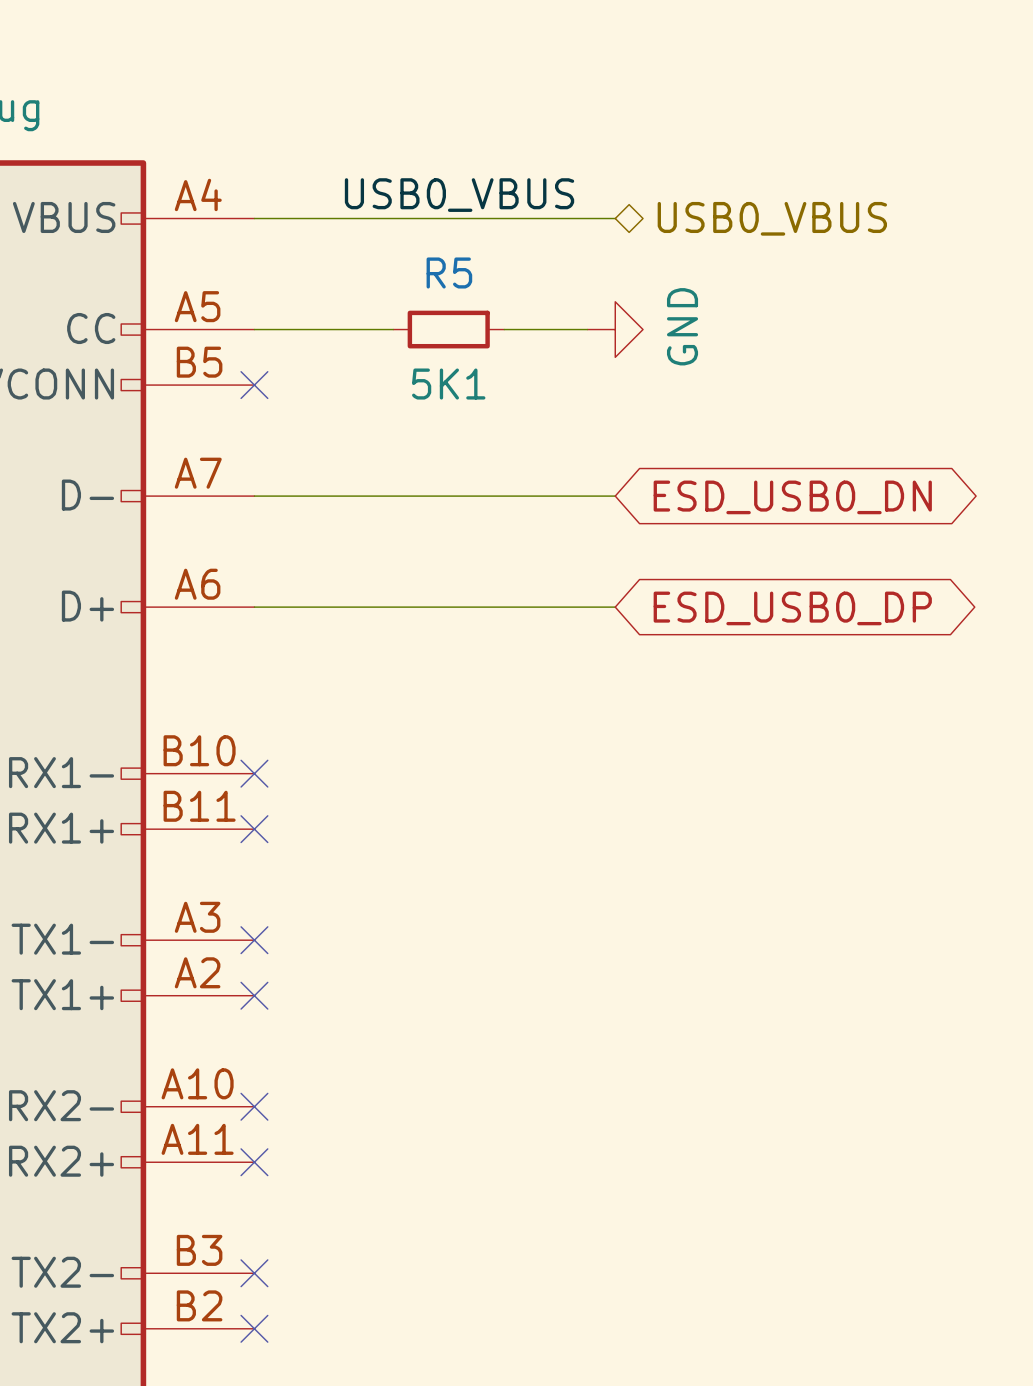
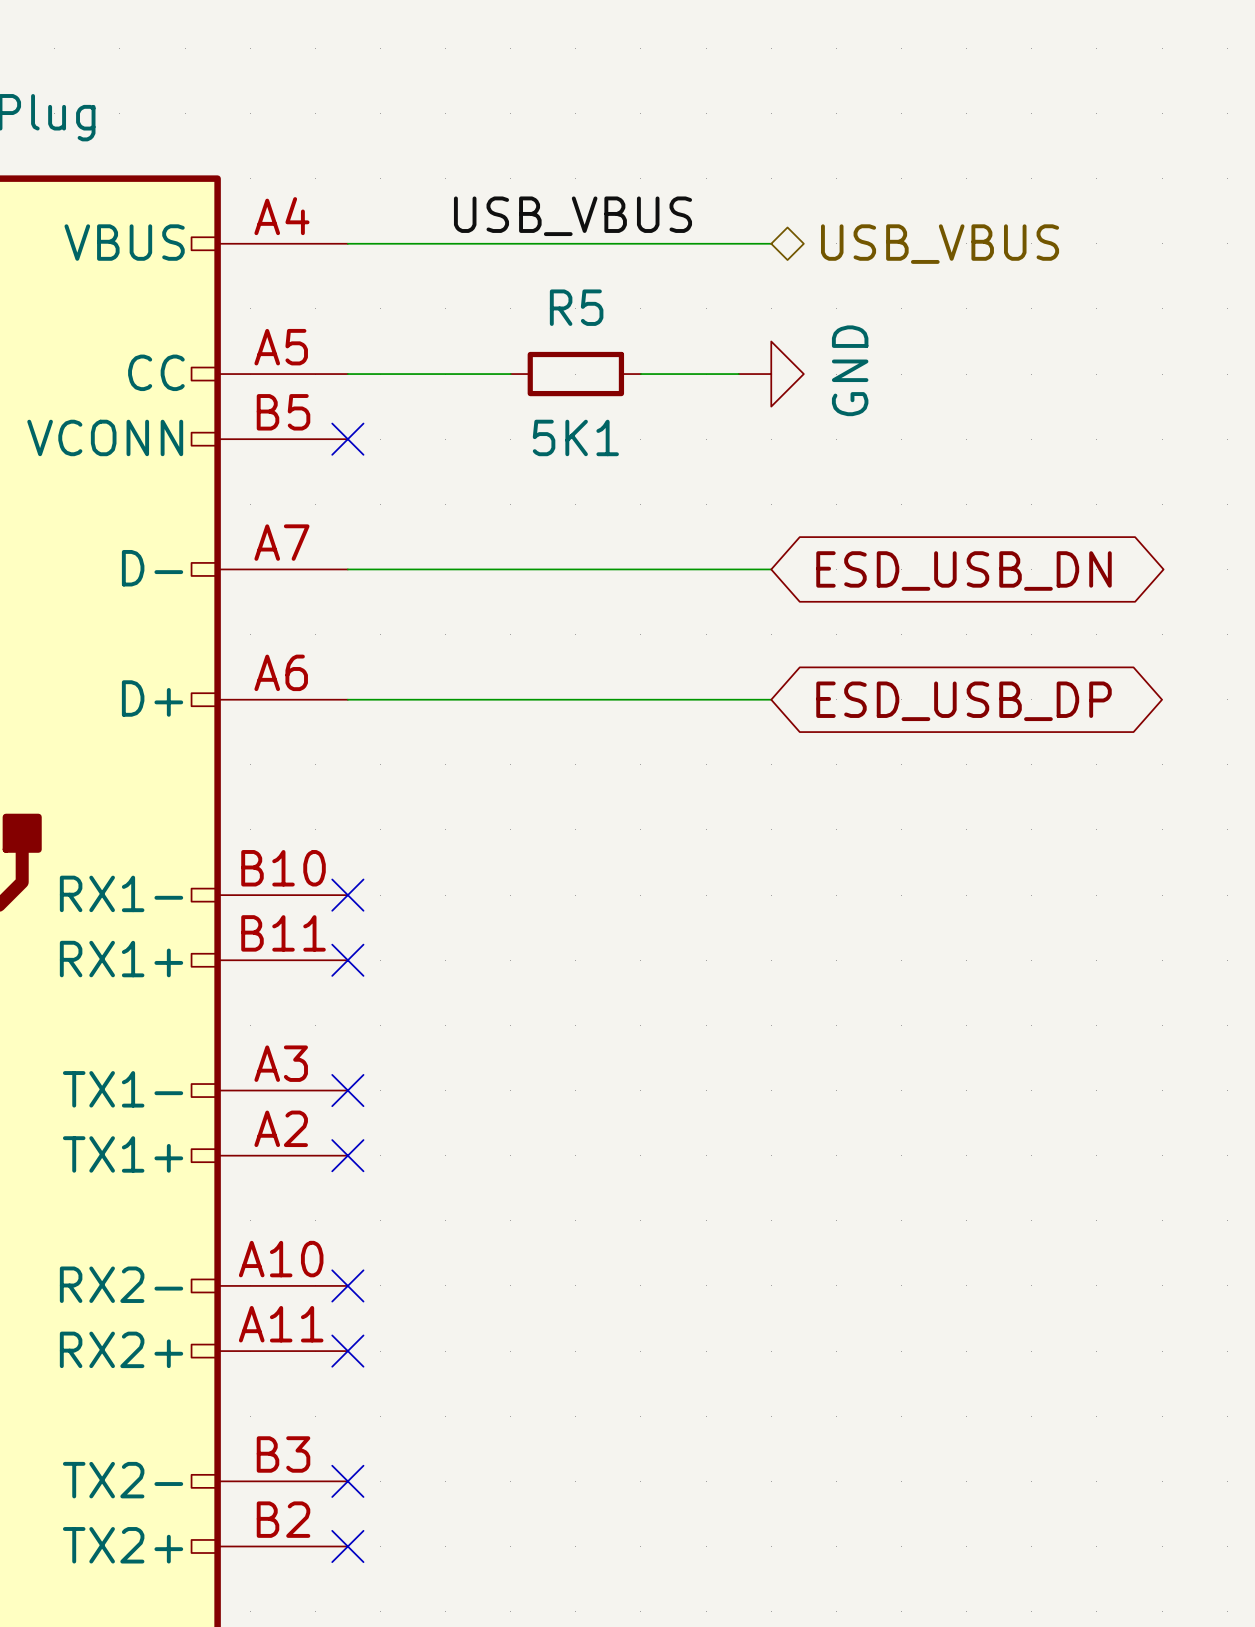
label: USB0_VBUS (459, 195) -> USB_VBUS (572, 216)
hierarchical label: USB0_VBUS (772, 218) -> USB_VBUS (940, 244)
global label: ESD_USB0_DN (792, 497) -> ESD_USB_DN (964, 570)
global label: ESD_USB0_DP (792, 608) -> ESD_USB_DP (964, 701)

